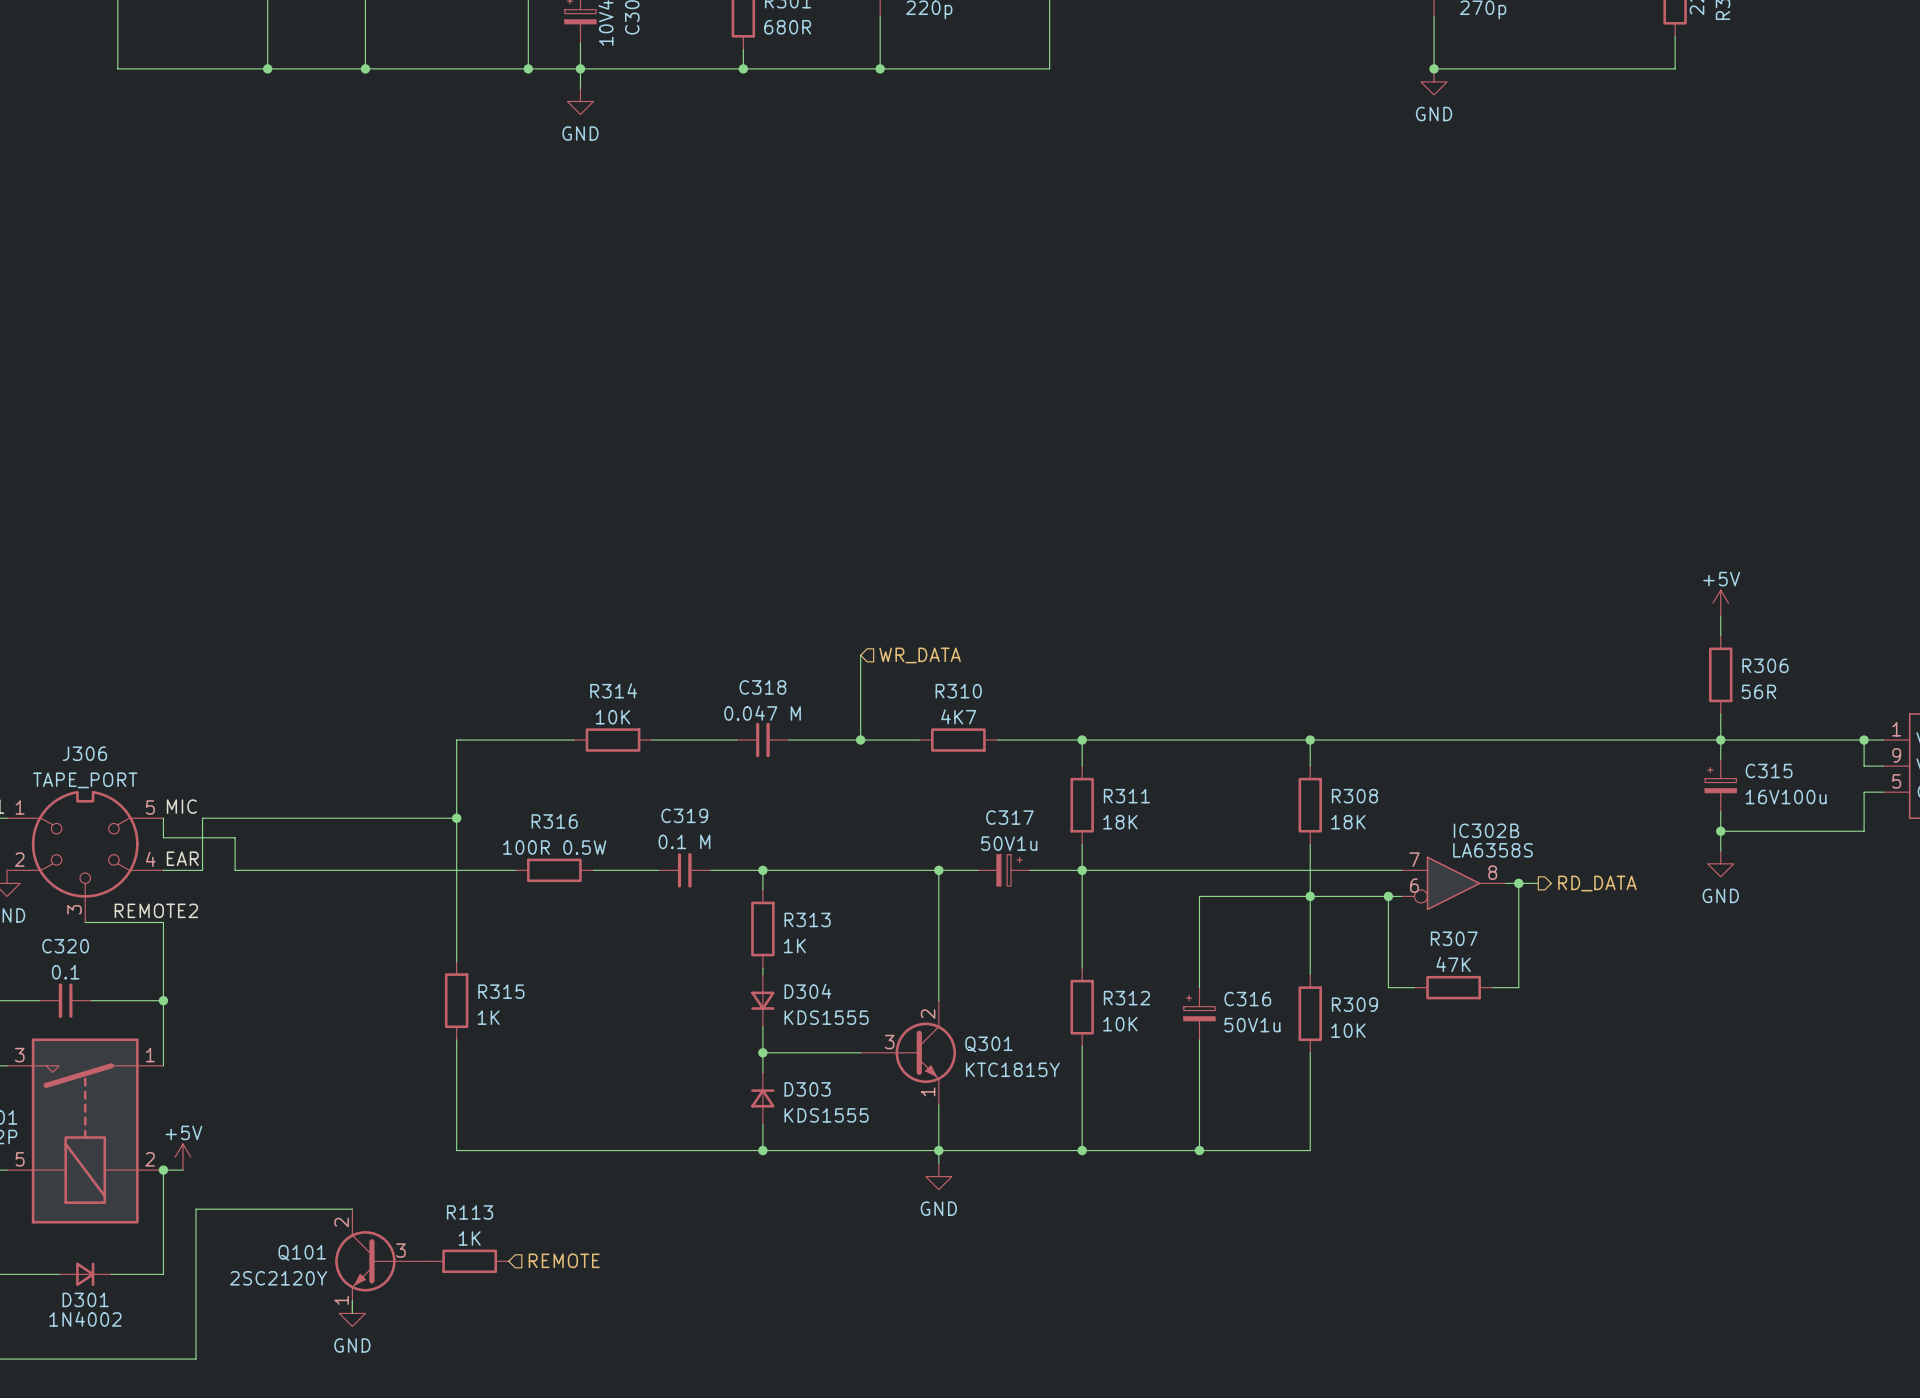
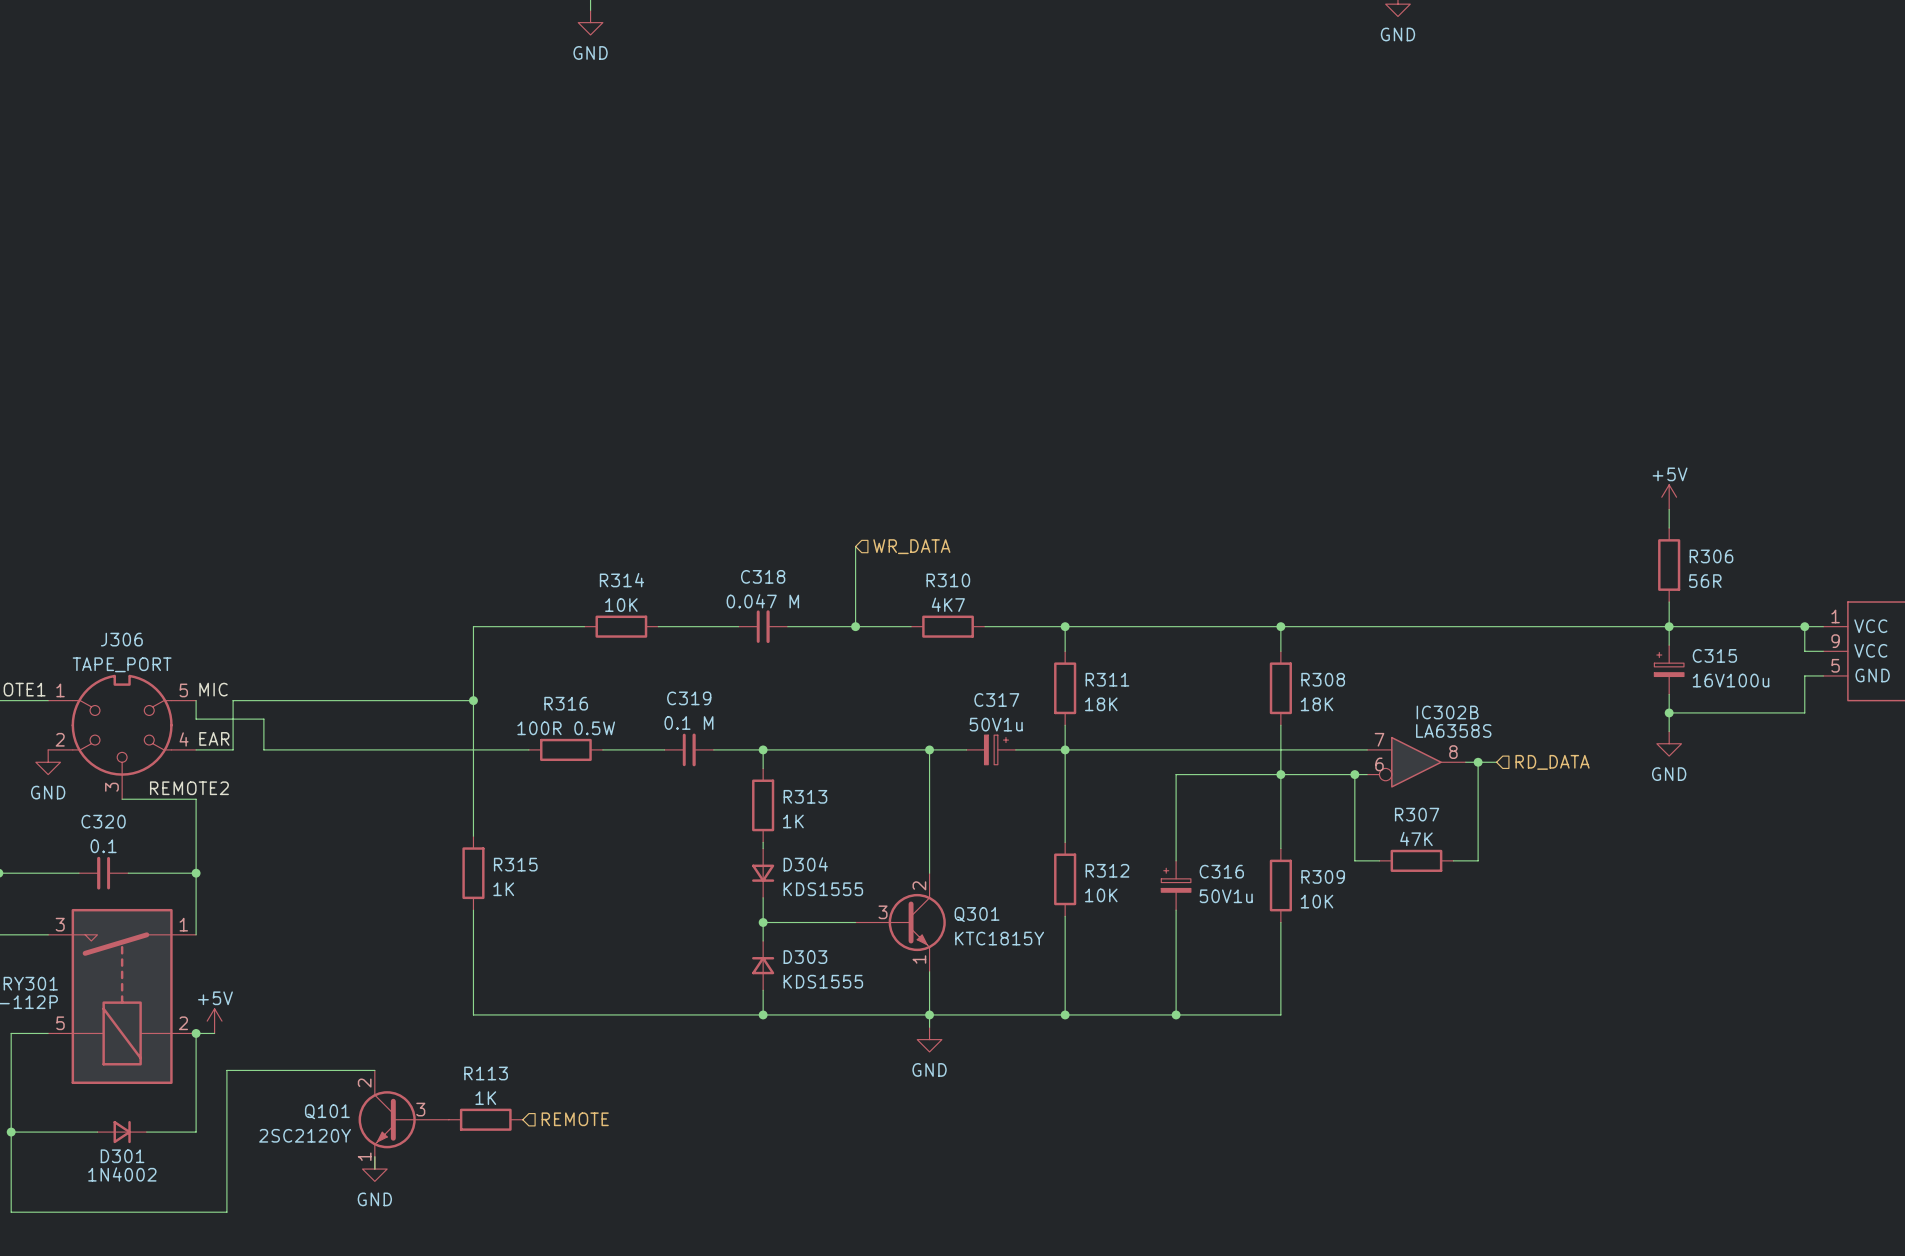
hierarchical label shape: output (1597, 883) -> input (1552, 762)

